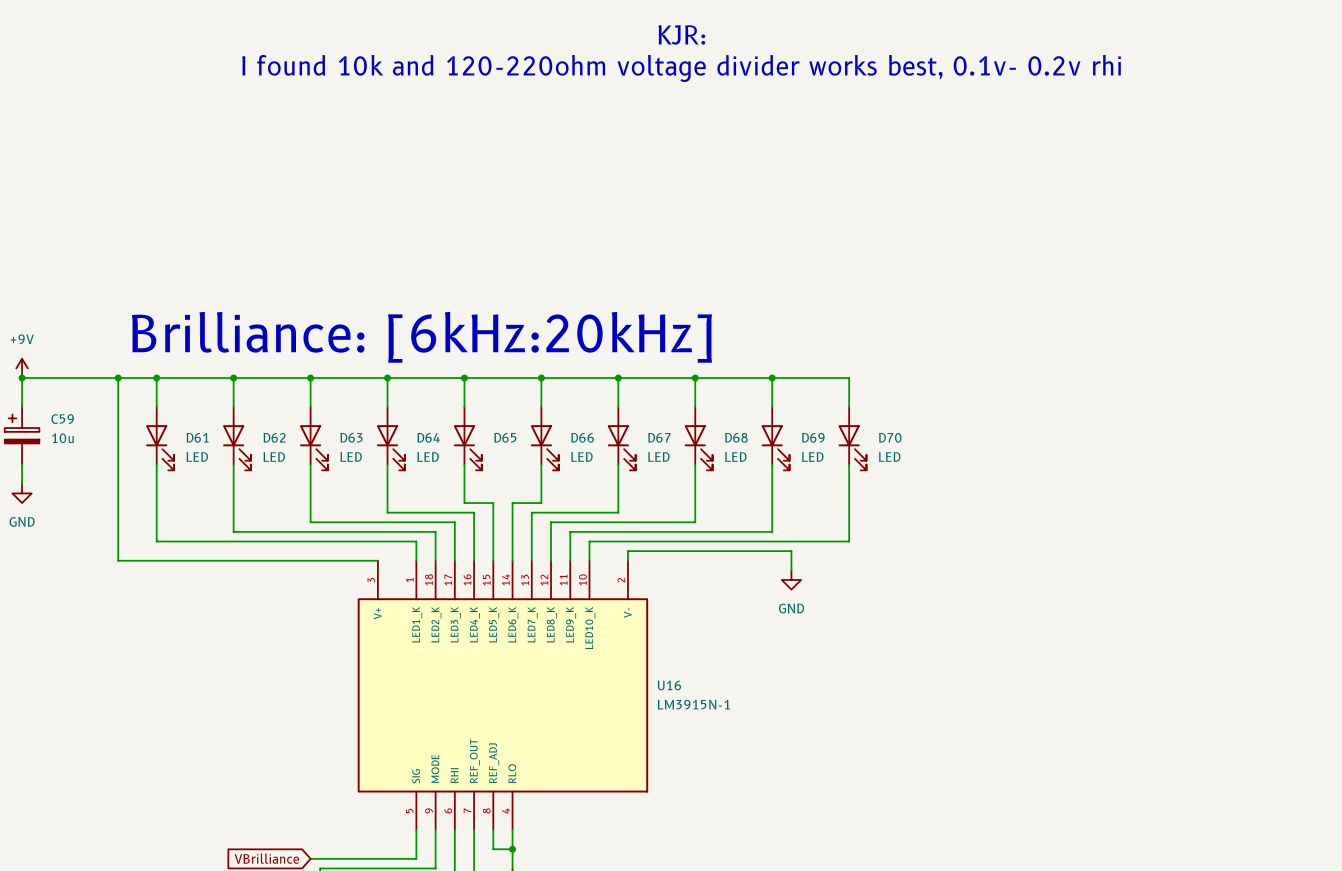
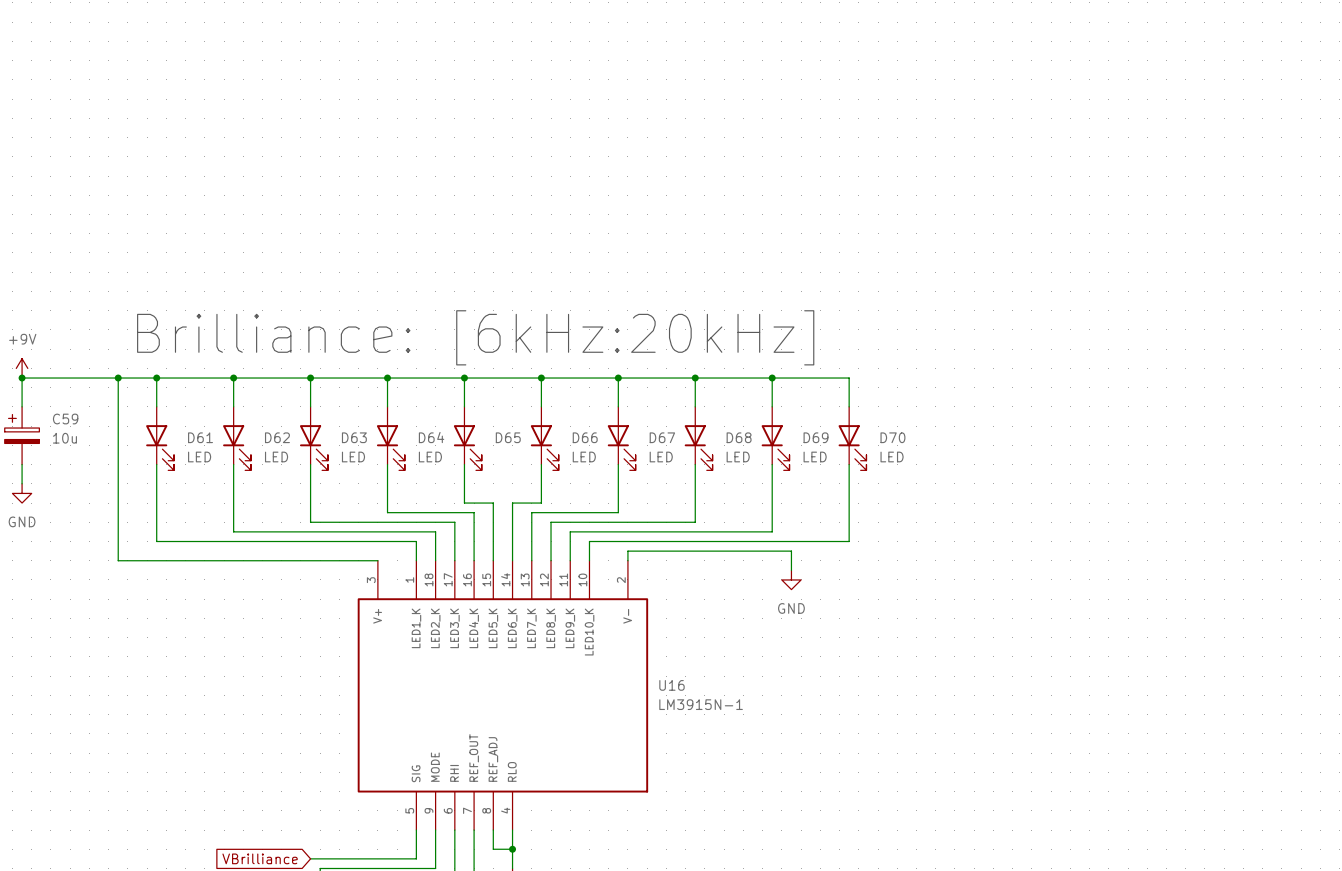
text: KJR: (681, 34) -> none
text: I found 10k and 120-220ohm voltage divider works best, 0.1v- 0.2v rhi (681, 68) -> none

